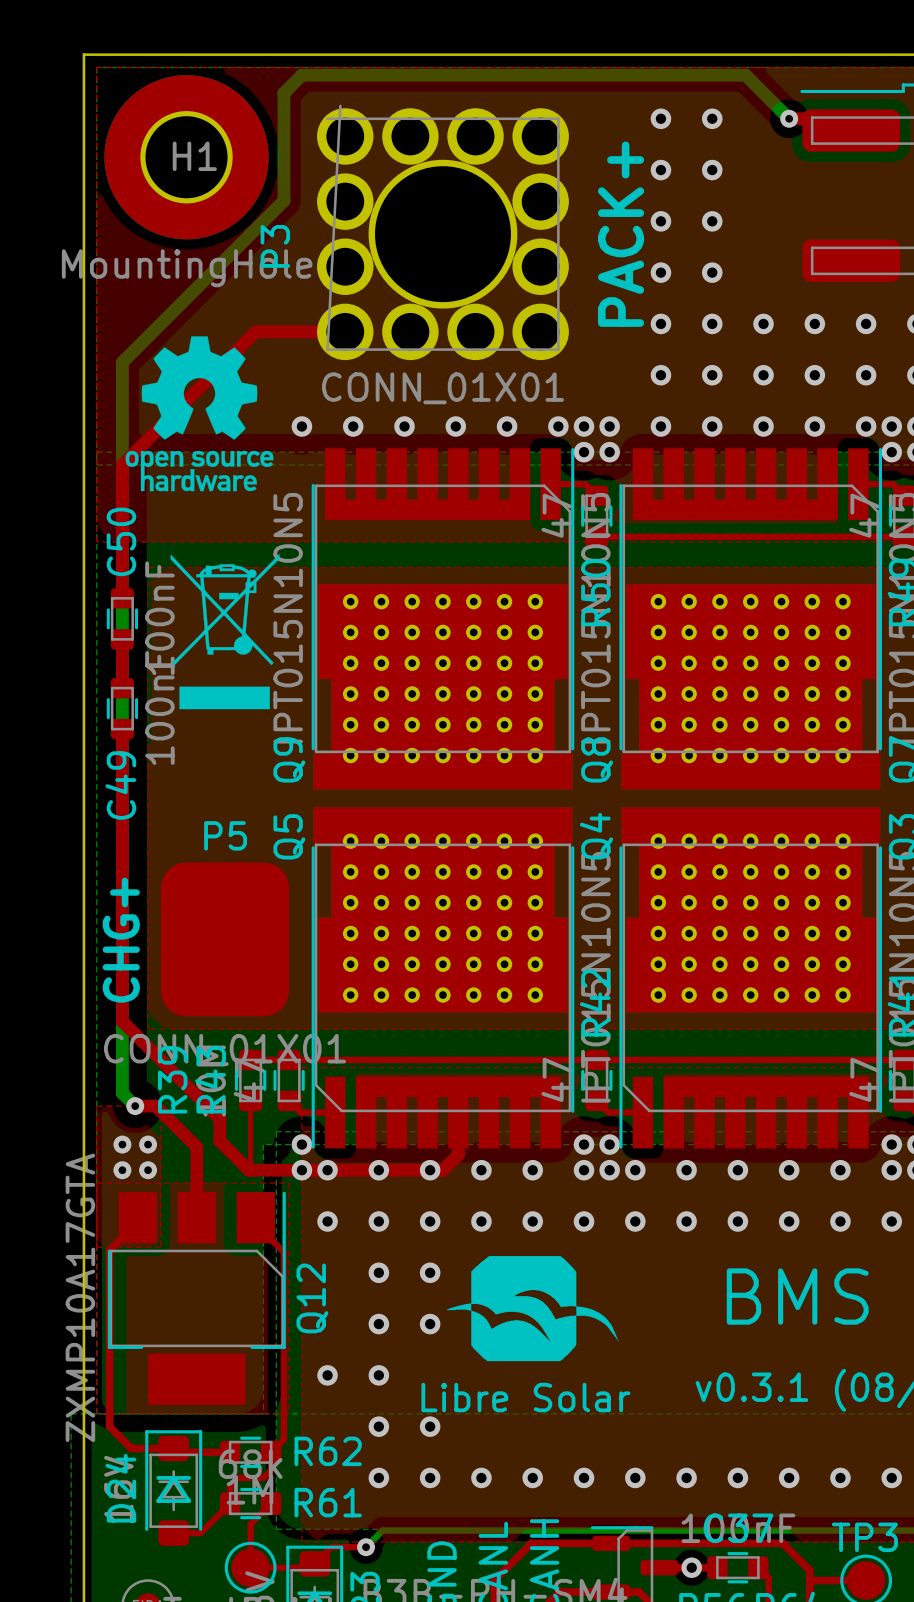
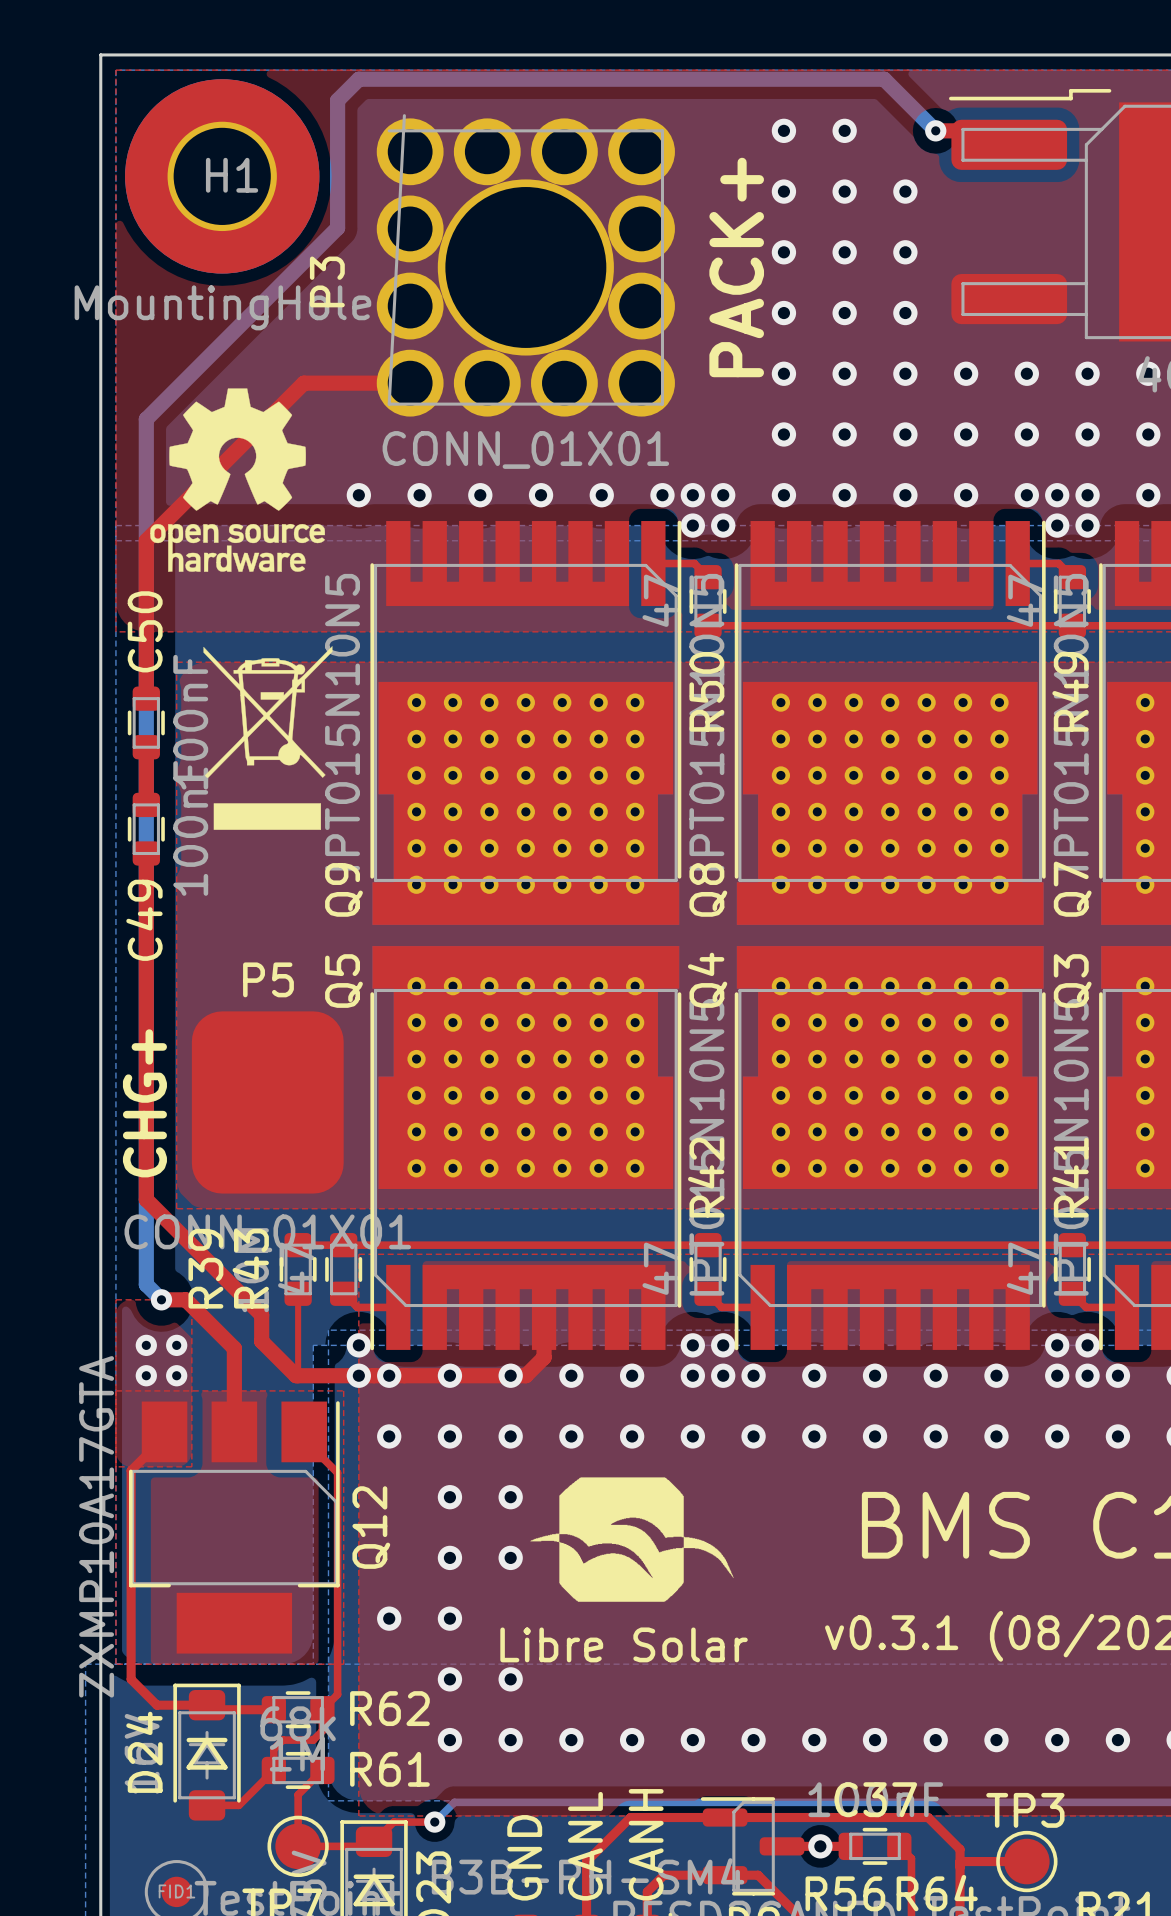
via: none -> (905, 191)
via: none -> (905, 252)
via: none -> (905, 313)

